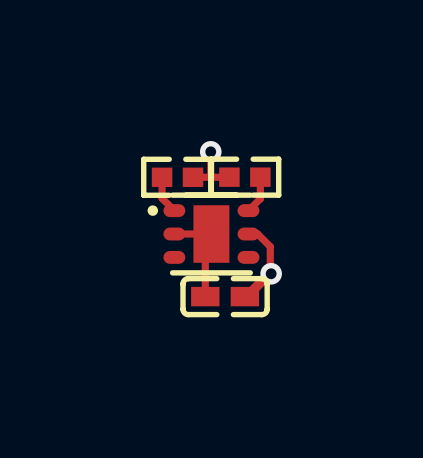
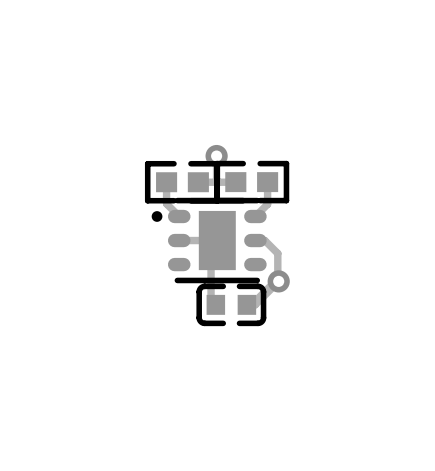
part footprint: [180, 275, 270, 318] -> [196, 283, 267, 327]

